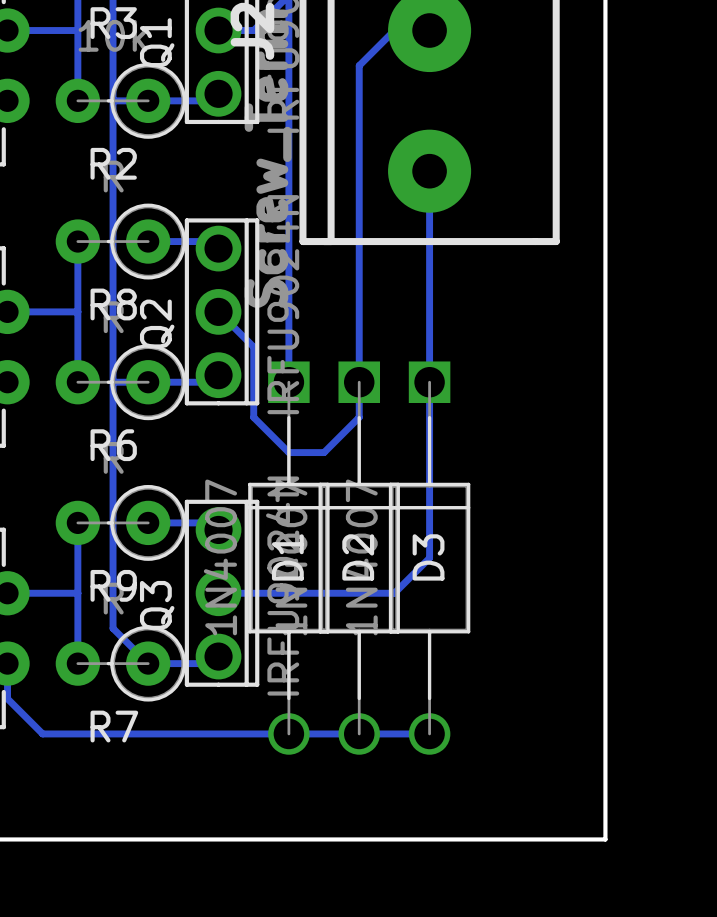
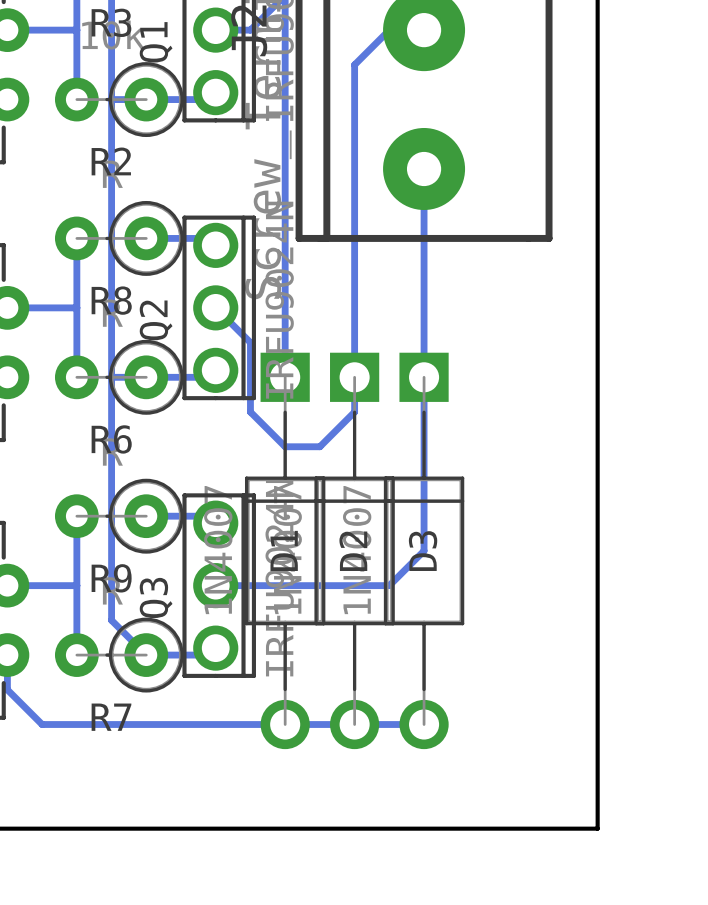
D1 footprint: [248, 361, 330, 755] -> [244, 352, 326, 750]
D2 footprint: [318, 361, 400, 755] -> [314, 352, 395, 750]
D3 footprint: [388, 361, 471, 755] -> [383, 352, 465, 750]

